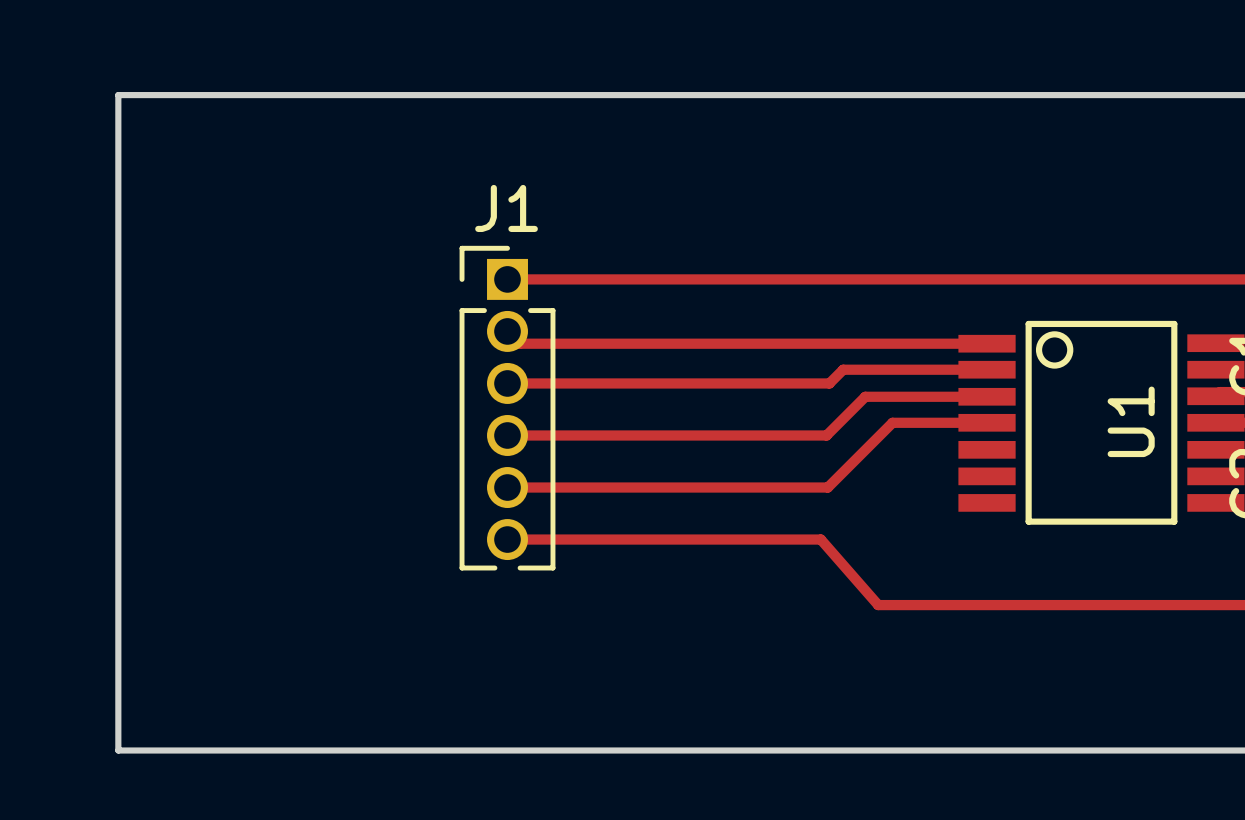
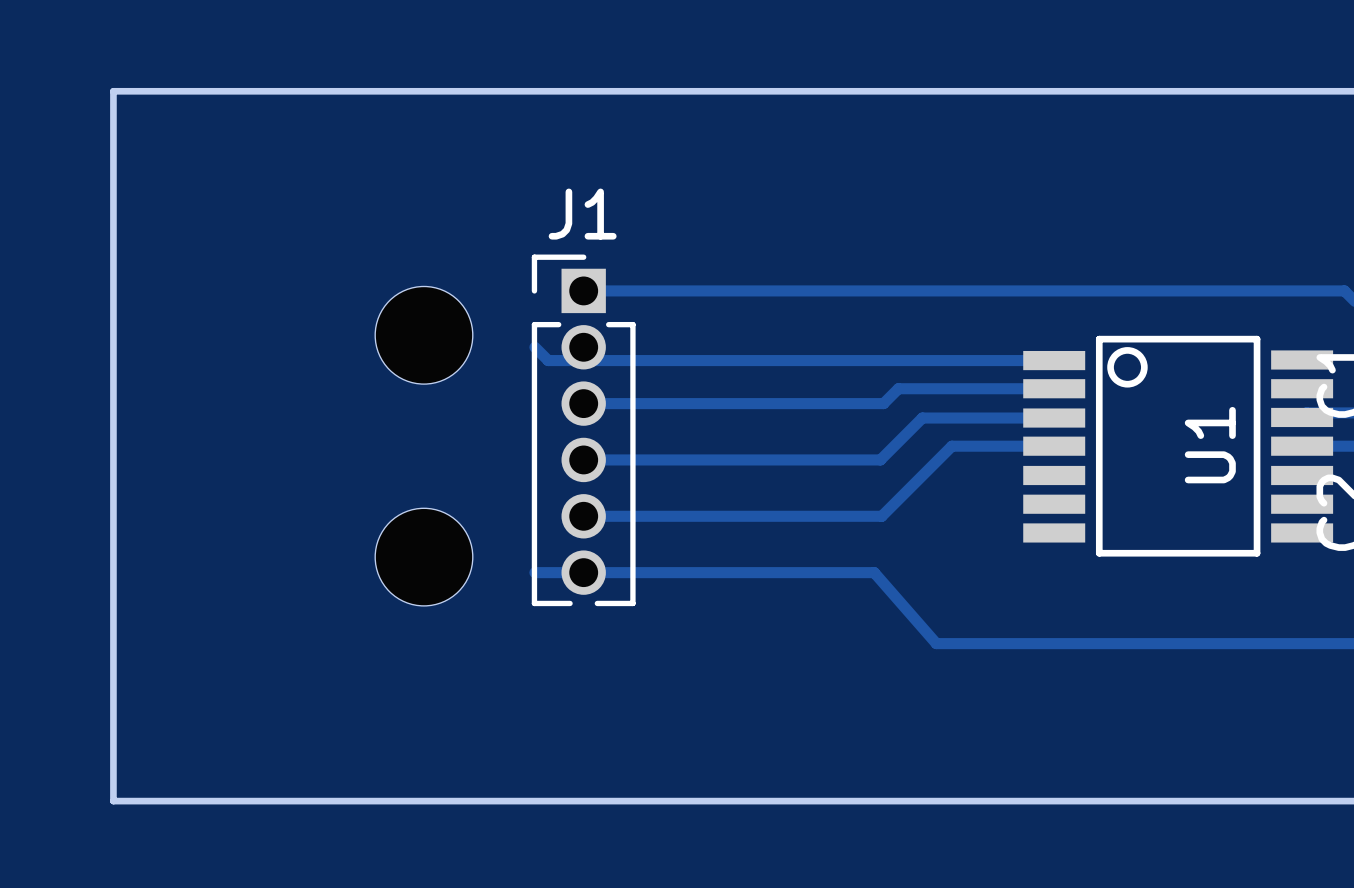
track: (507, 279) (552, 279) -> none
part: none -> (423, 335)
track: (507, 383) (552, 383) -> none
J1 position: (507, 408) -> (583, 430)
track: (507, 435) (552, 435) -> none
track: (507, 487) (552, 487) -> none
part: none -> (423, 557)

